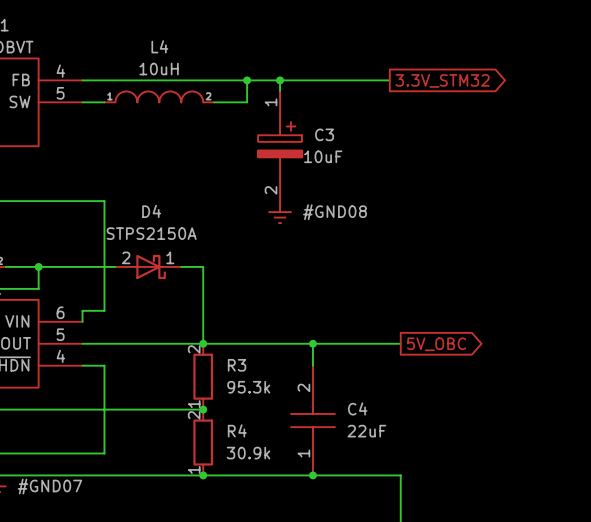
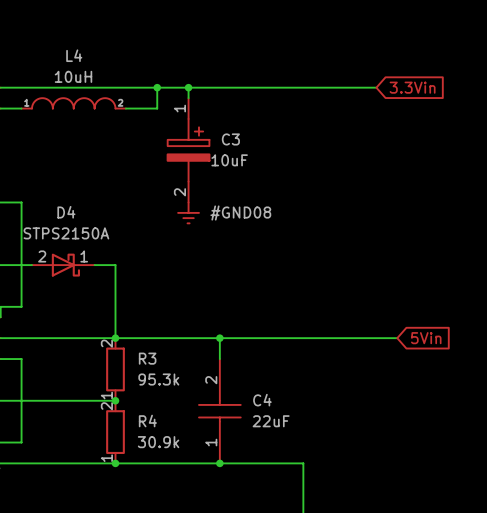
wire: none -> (292, 87) (376, 87)
global label: 3.3V_STM32 (442, 80) -> none
global label: none -> 3.3Vin (412, 87)
wire: none -> (303, 338) (397, 338)
global label: none -> 5Vin (426, 338)
global label: 5V_OBC (436, 344) -> none

